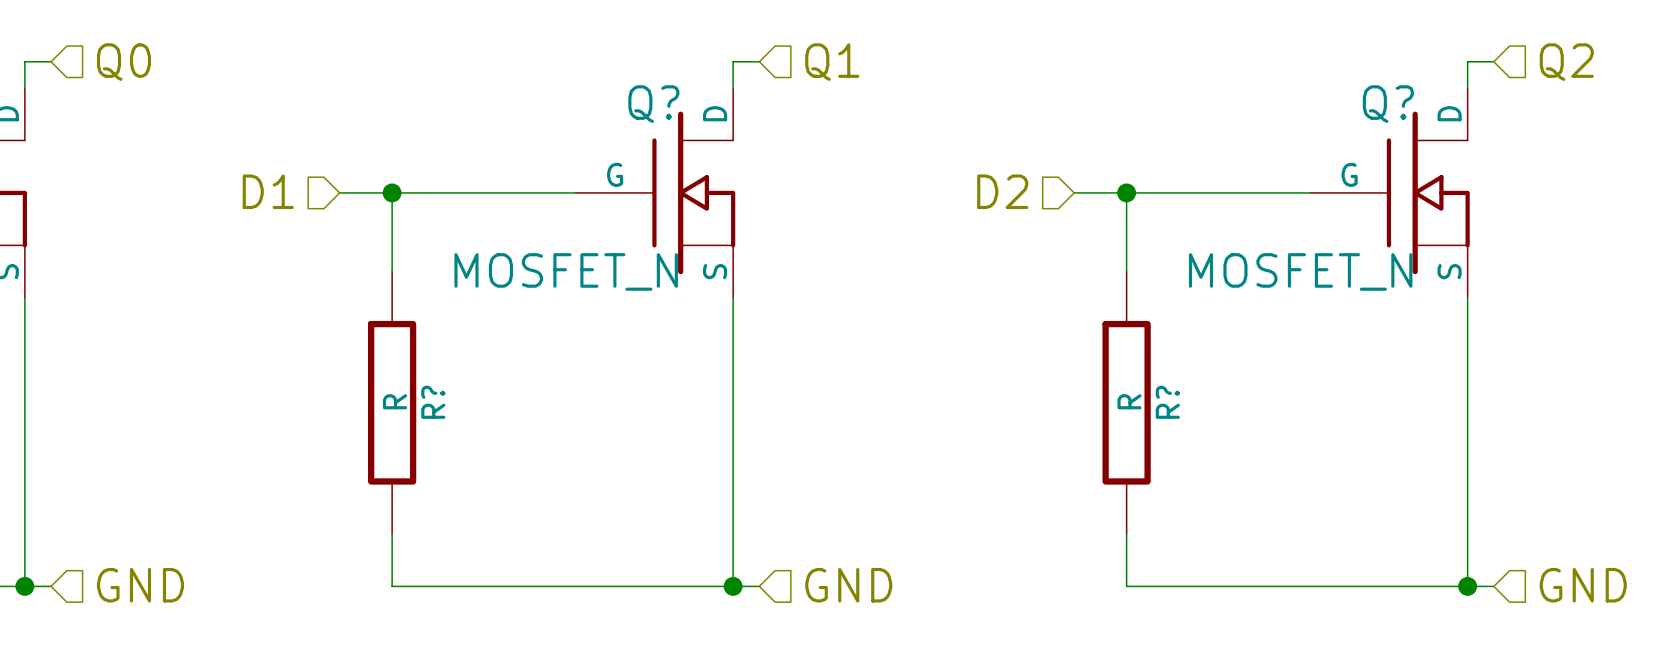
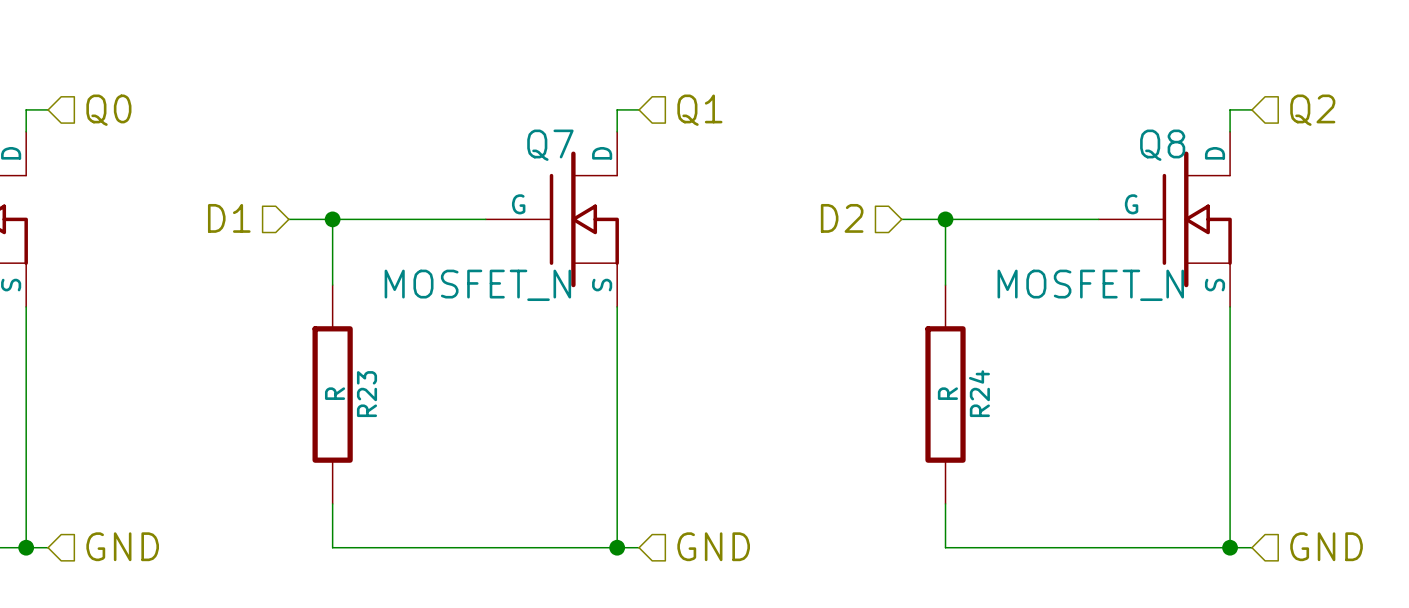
Q? name: Q? (653, 104) -> Q7 (550, 145)
Q? name: Q? (1388, 104) -> Q8 (1162, 145)
R? name: R? (433, 402) -> R23 (366, 394)
R? name: R? (1167, 402) -> R24 (979, 393)

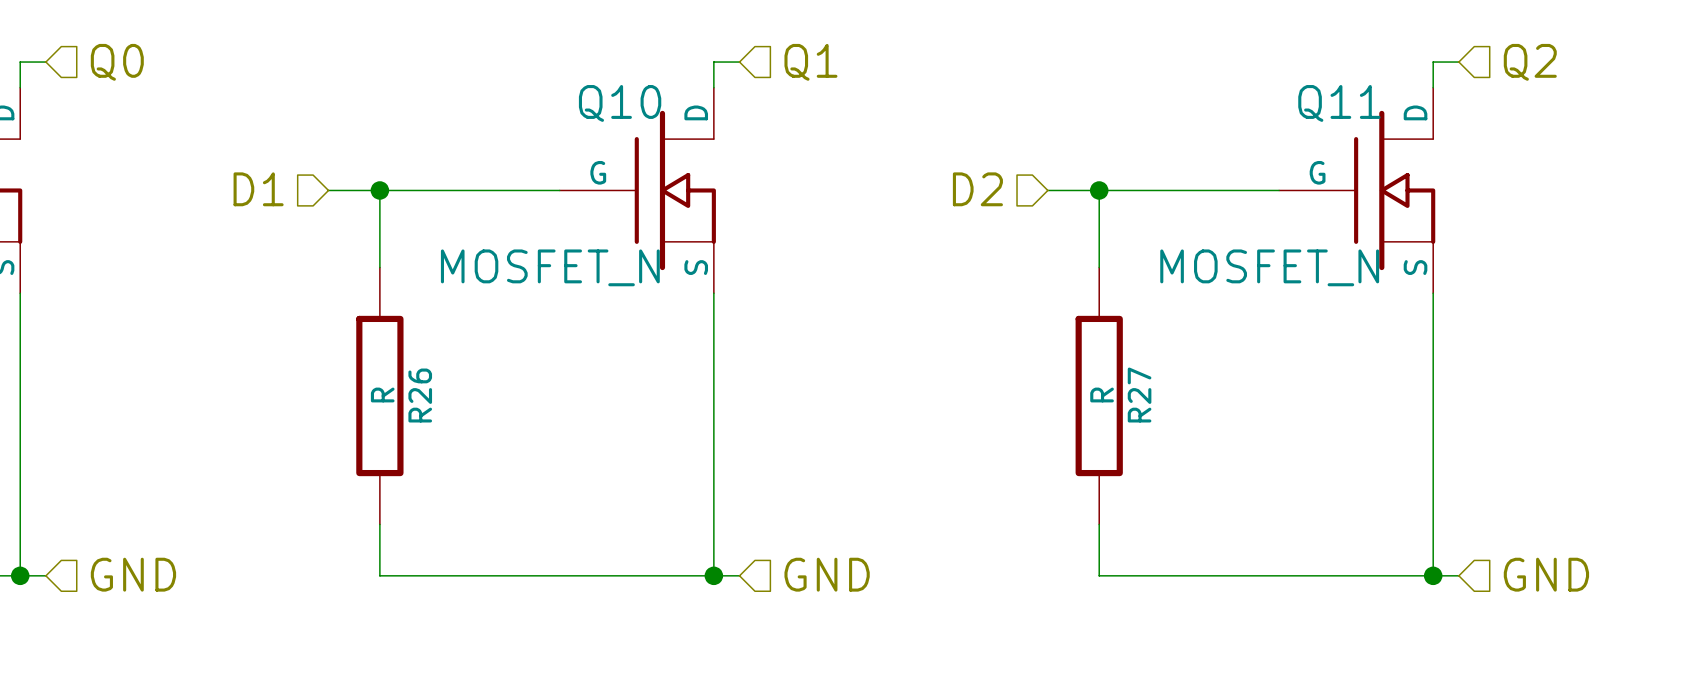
Q7 name: Q7 (550, 145) -> Q10 (620, 103)
Q8 name: Q8 (1162, 145) -> Q11 (1339, 103)
R24 name: R24 (979, 393) -> R27 (1139, 395)
R23 name: R23 (366, 394) -> R26 (420, 395)

